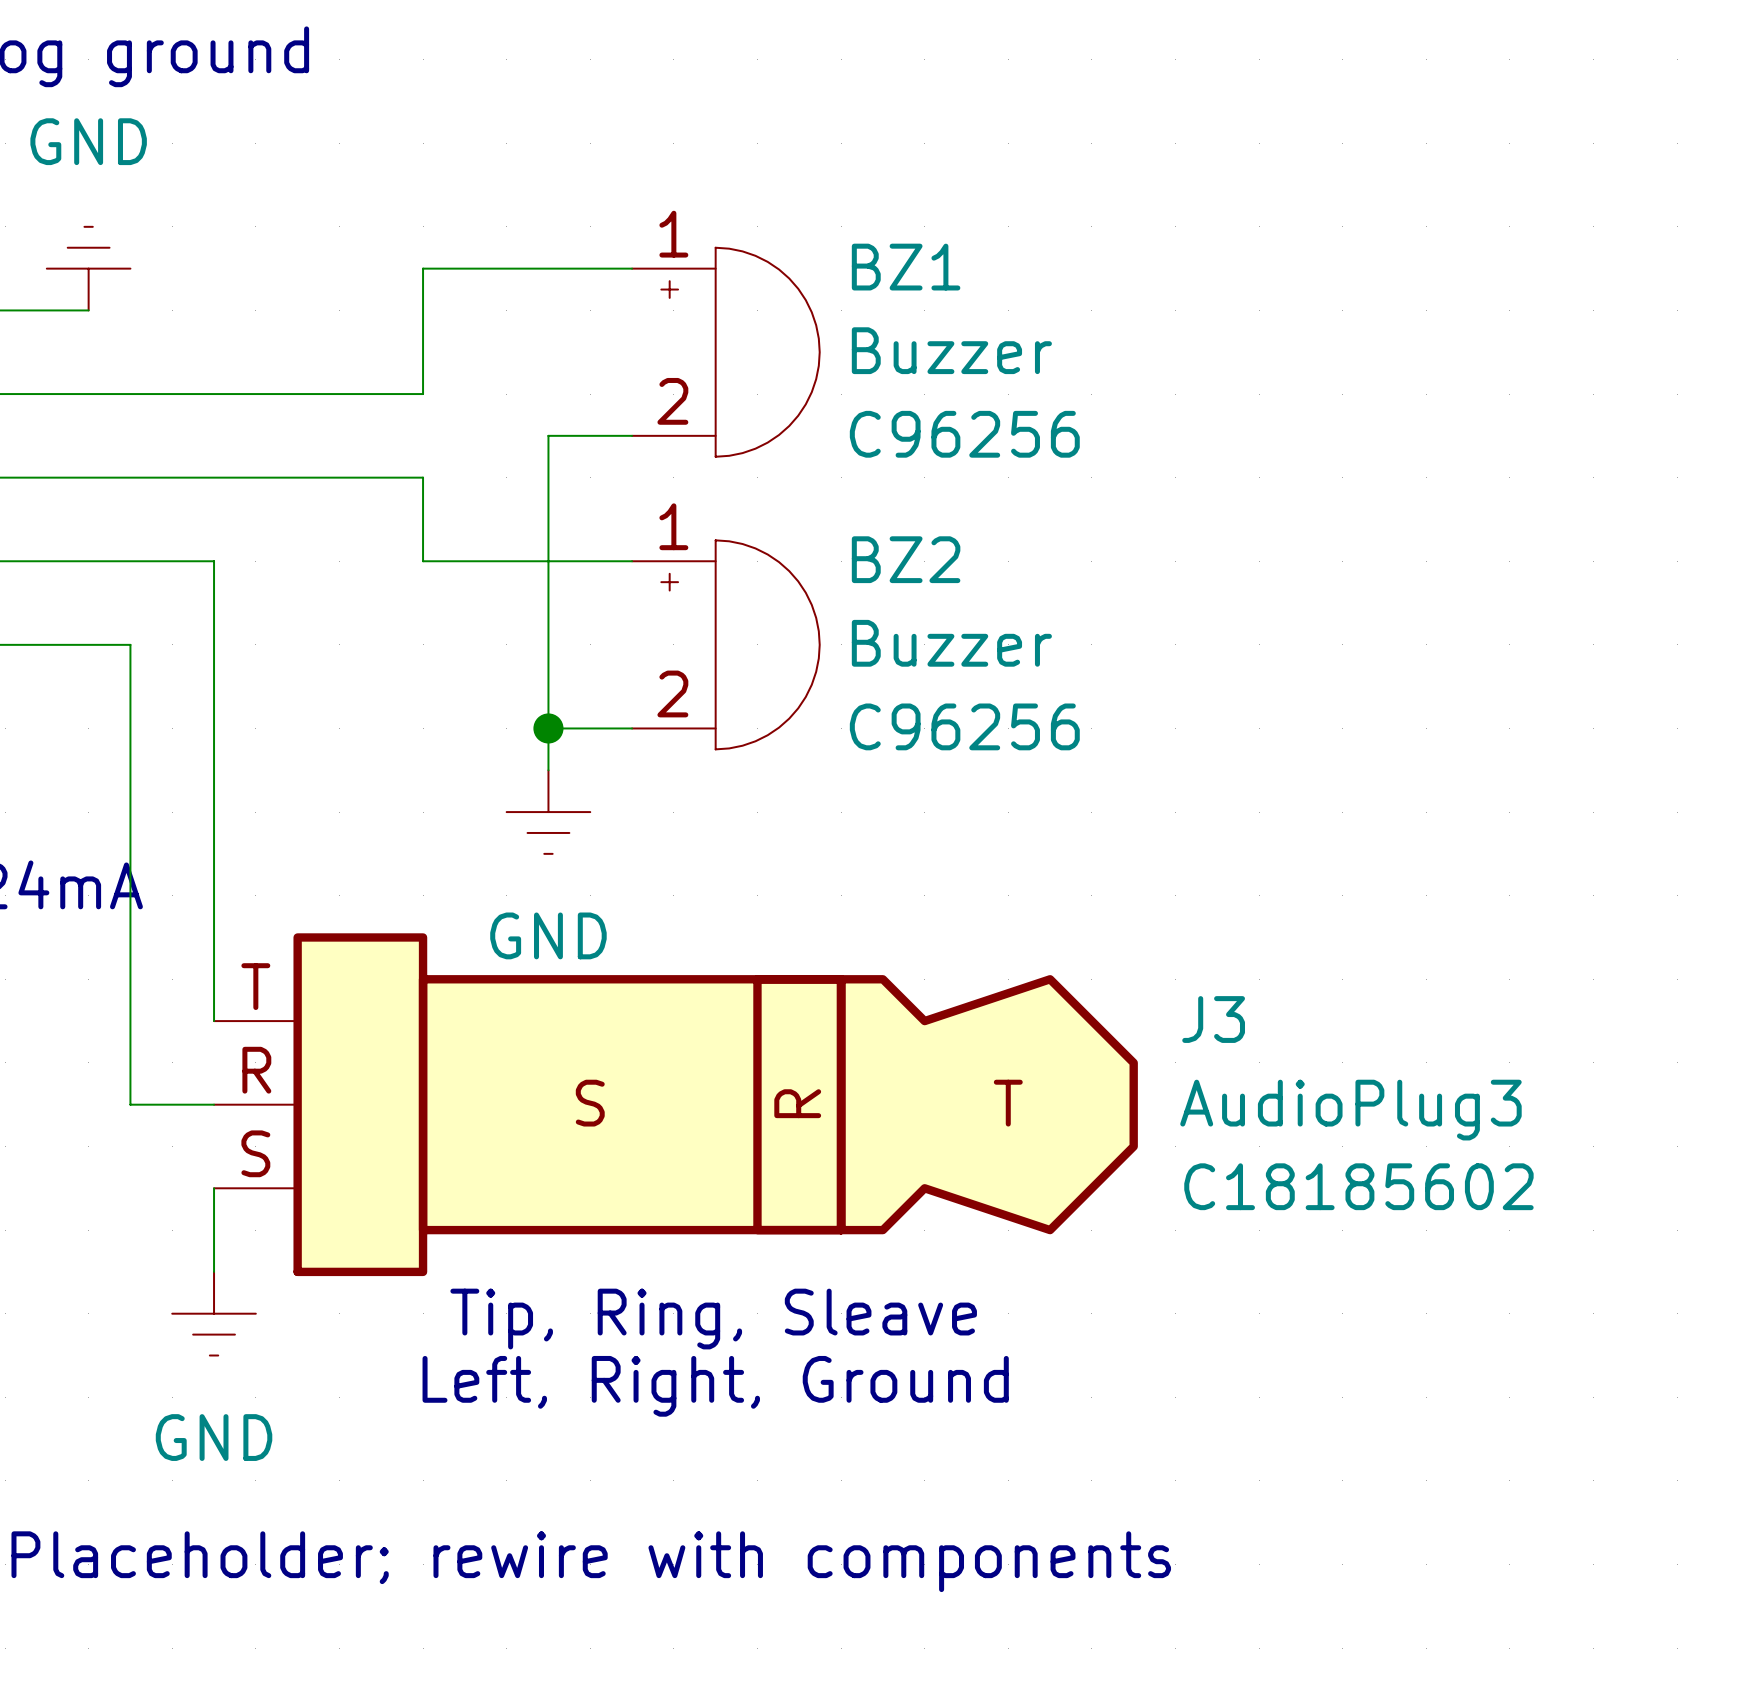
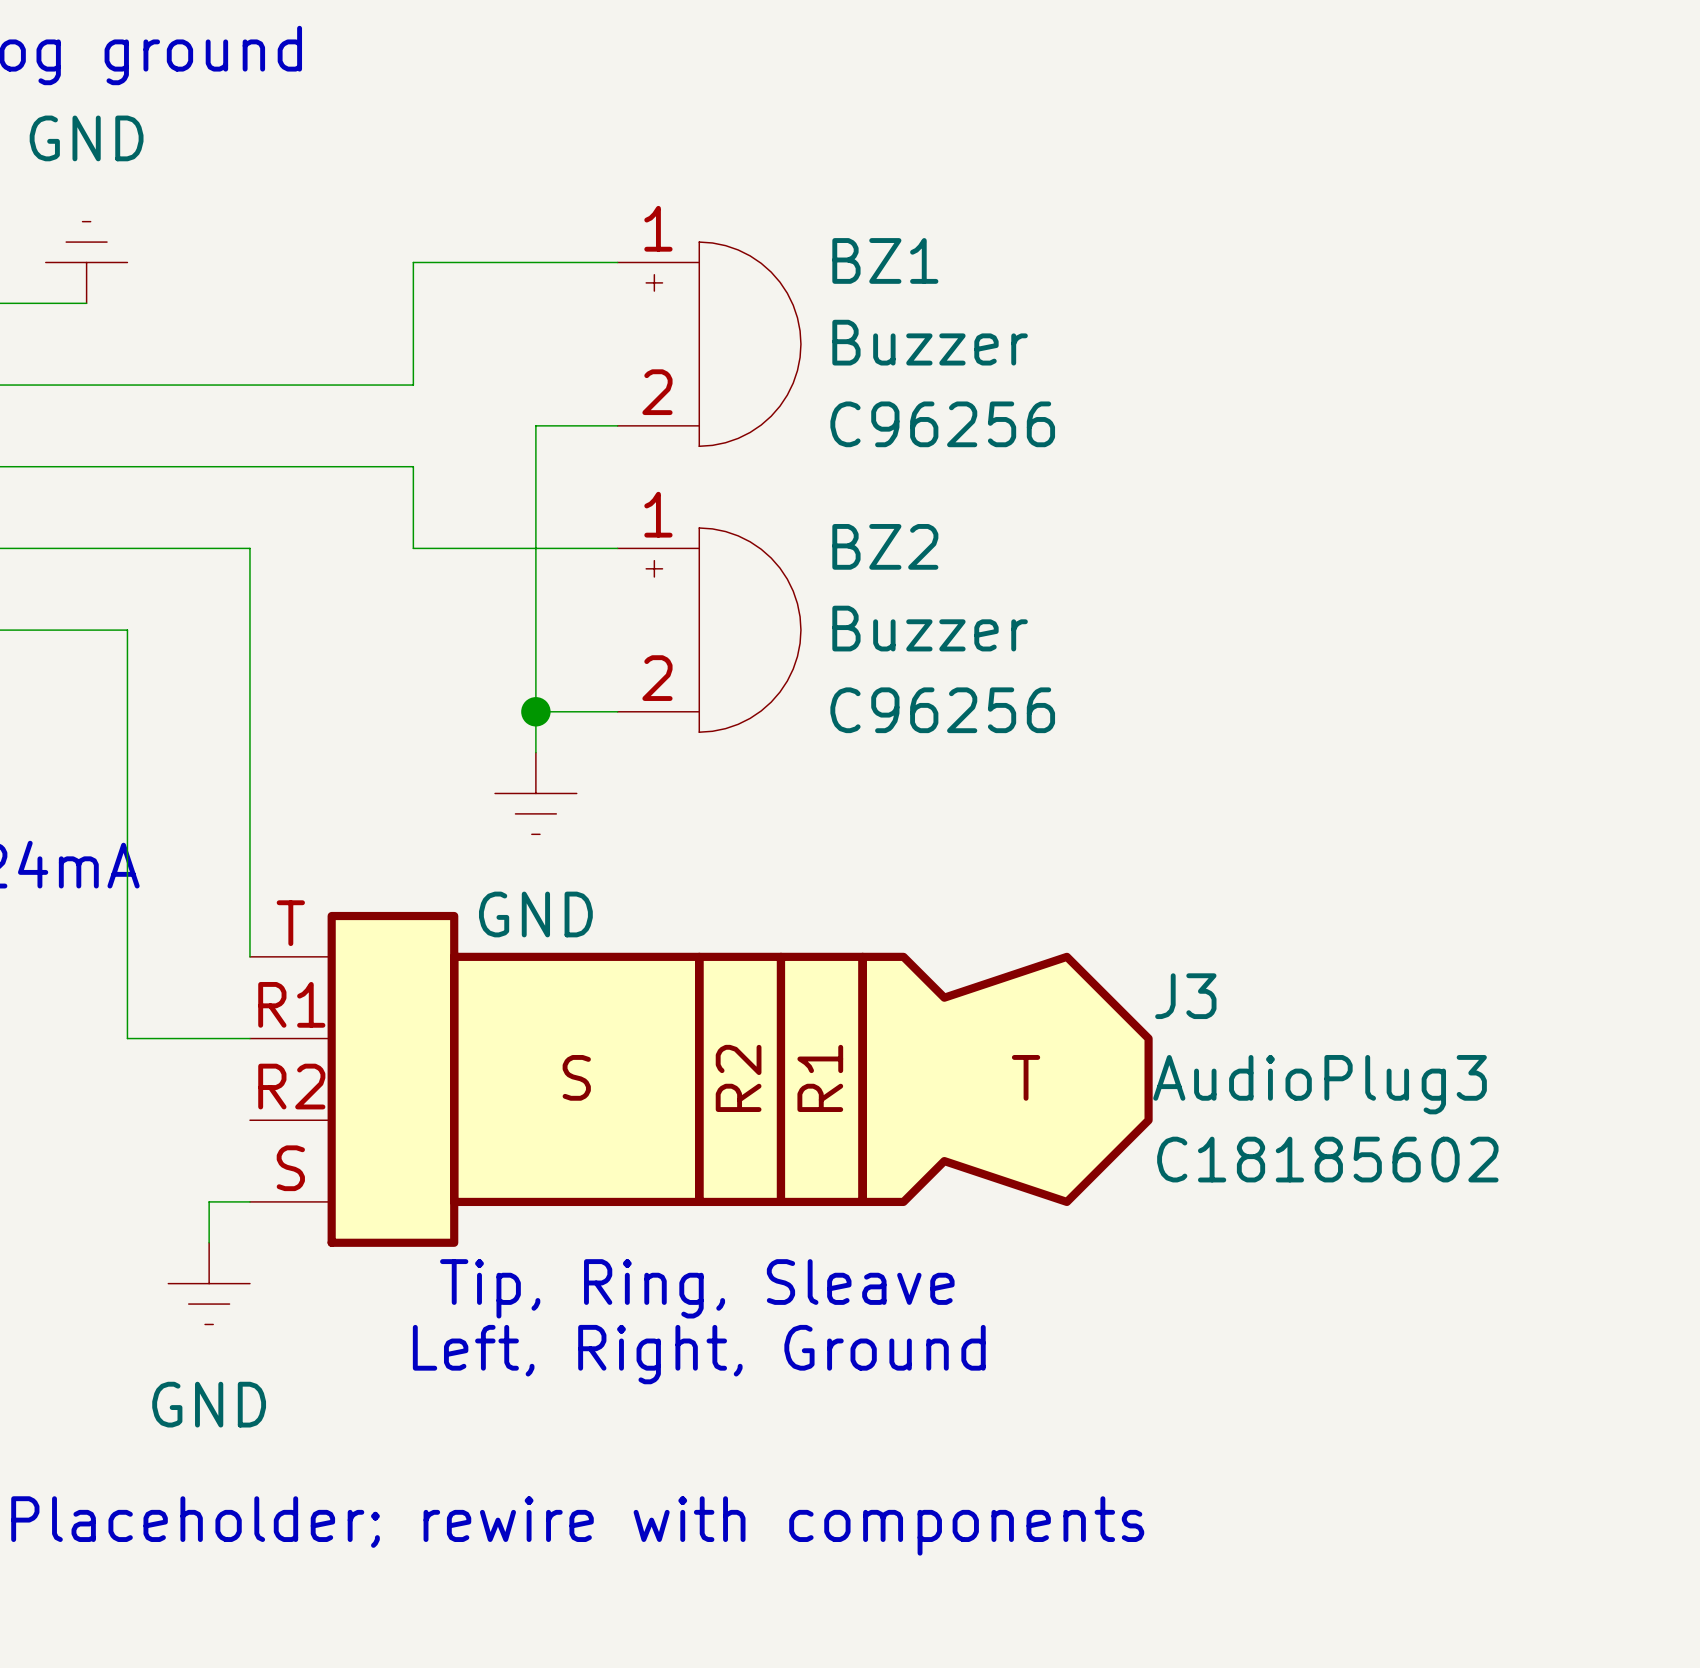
wire: (214, 561) (214, 1021) -> (209, 548) (249, 548) (249, 956)
J3 symbol: [214, 933, 1138, 1277] -> [249, 911, 1153, 1247]
wire: (130, 1062) (130, 1104) (214, 1104) -> (127, 1038) (249, 1038)
wire: (214, 1188) (214, 1230) -> (249, 1201) (209, 1201)

